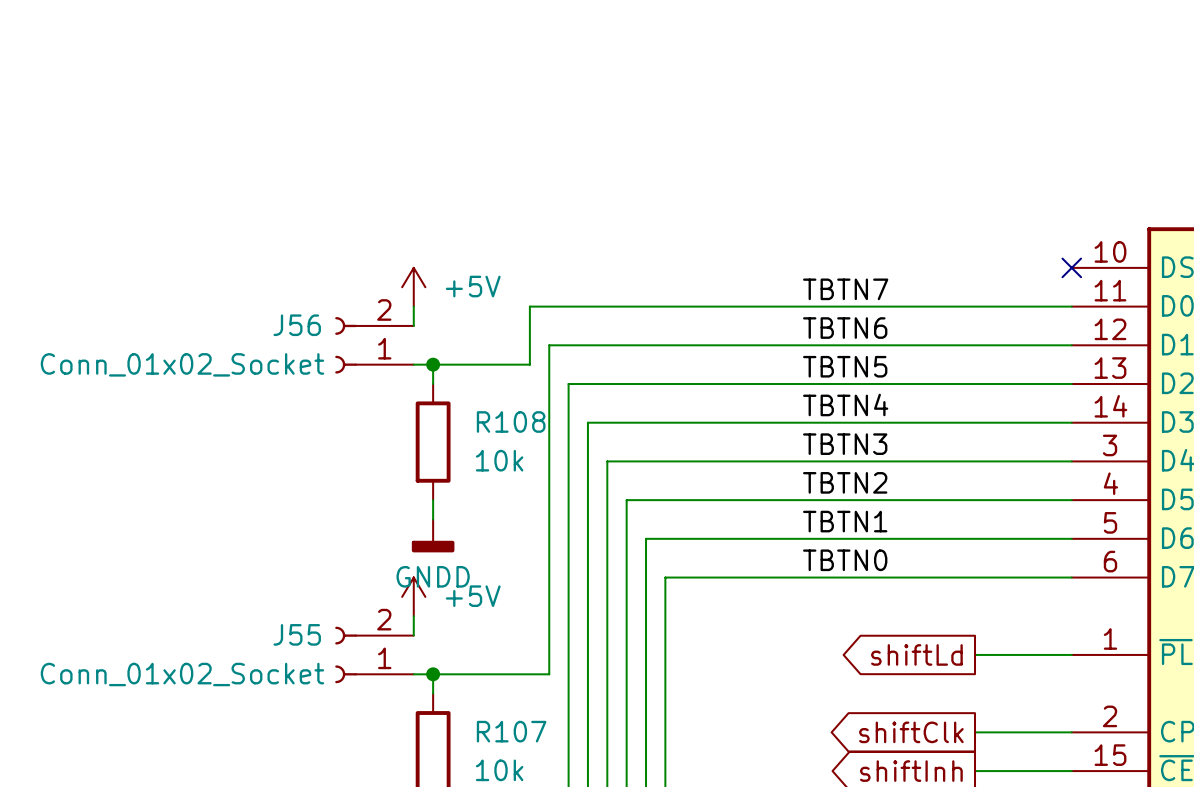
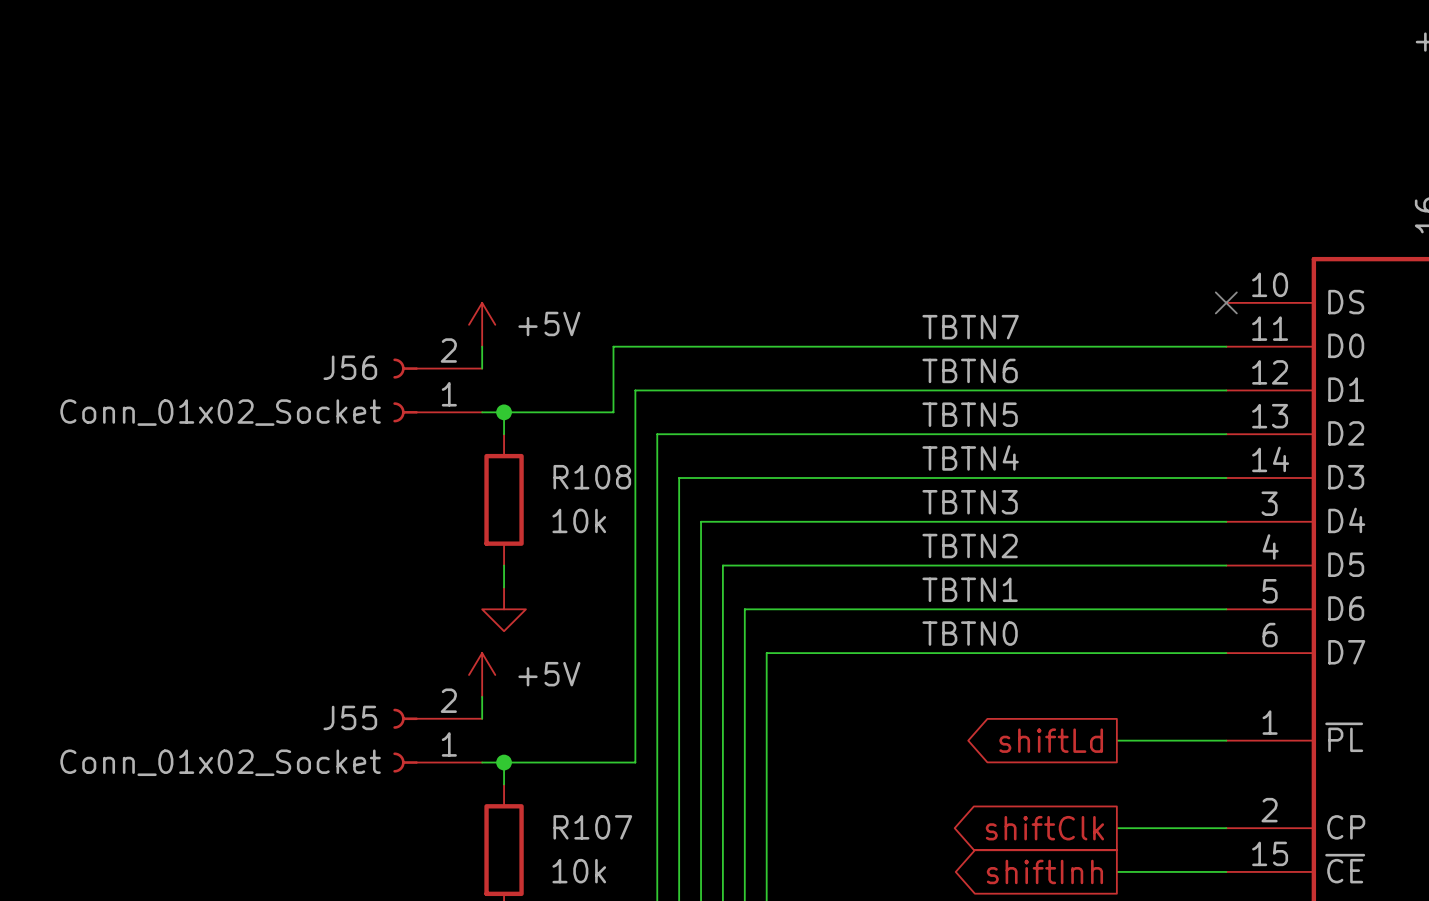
power symbol shape: [411, 519, 455, 553] -> [482, 587, 526, 632]
power symbol text: GNDD (433, 576) -> none

